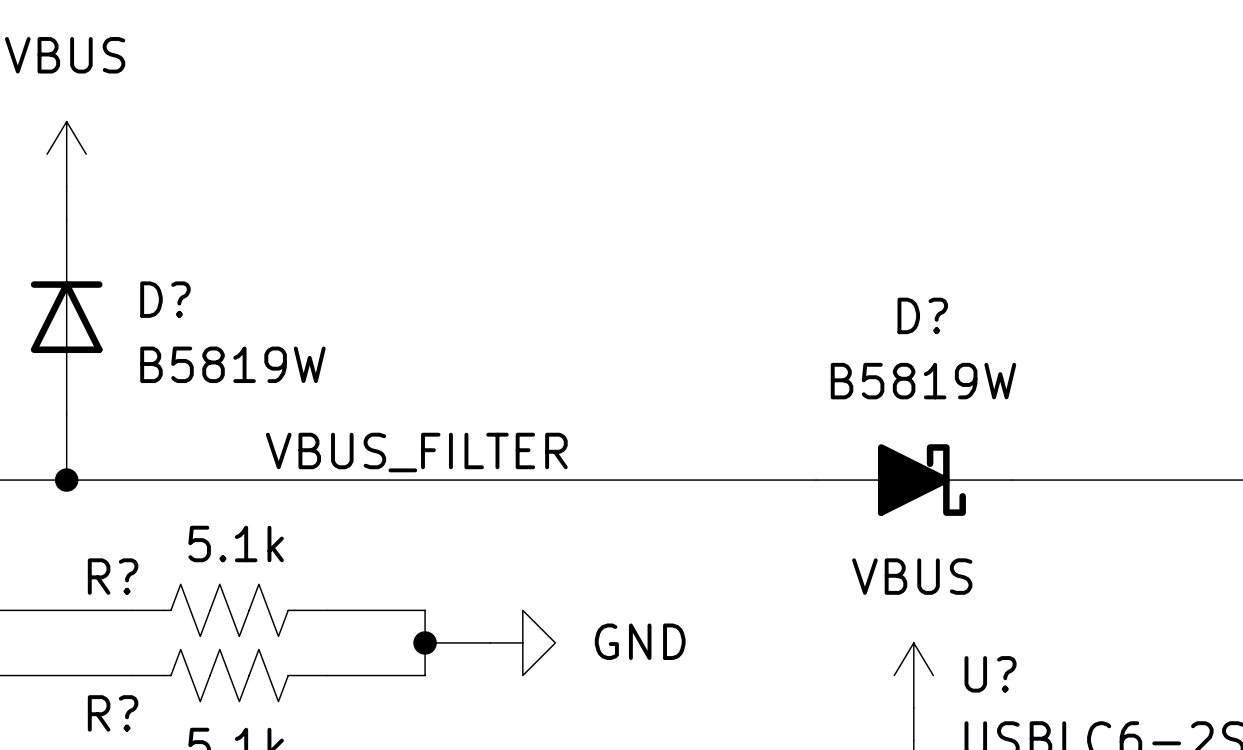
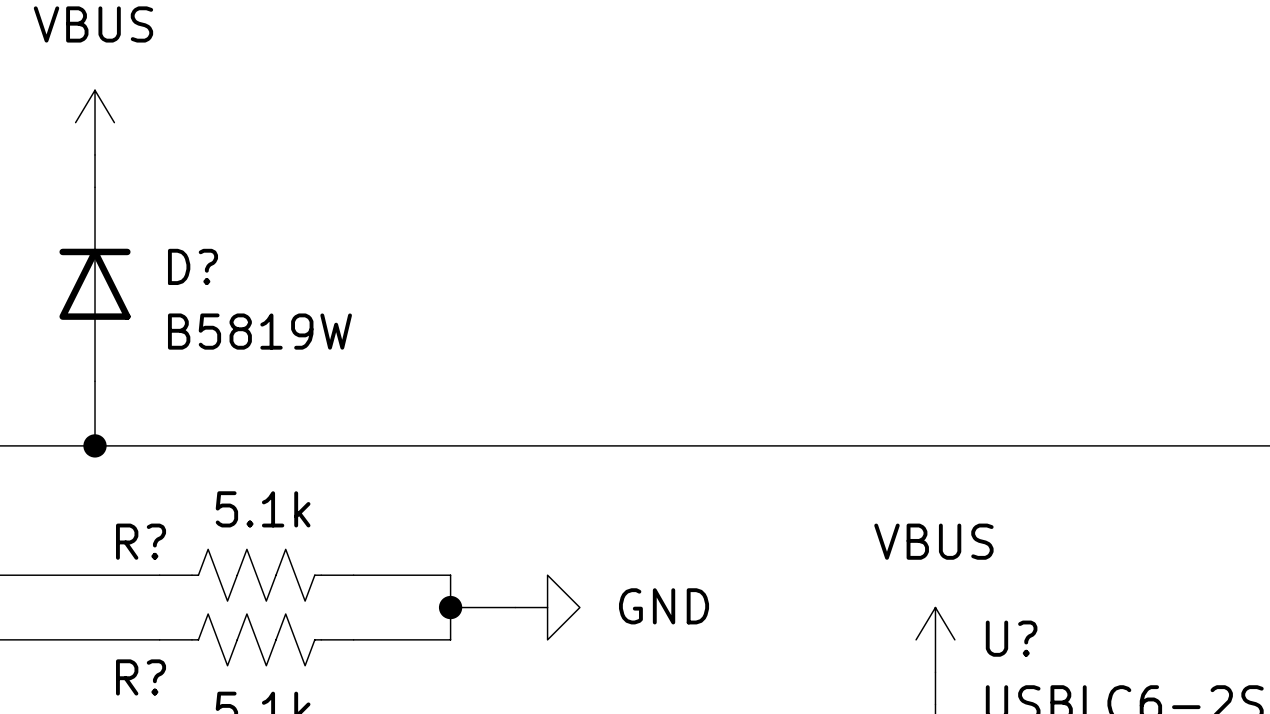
label: VBUS_FILTER (416, 452) -> none
D?: B5819W (913, 480) -> none

